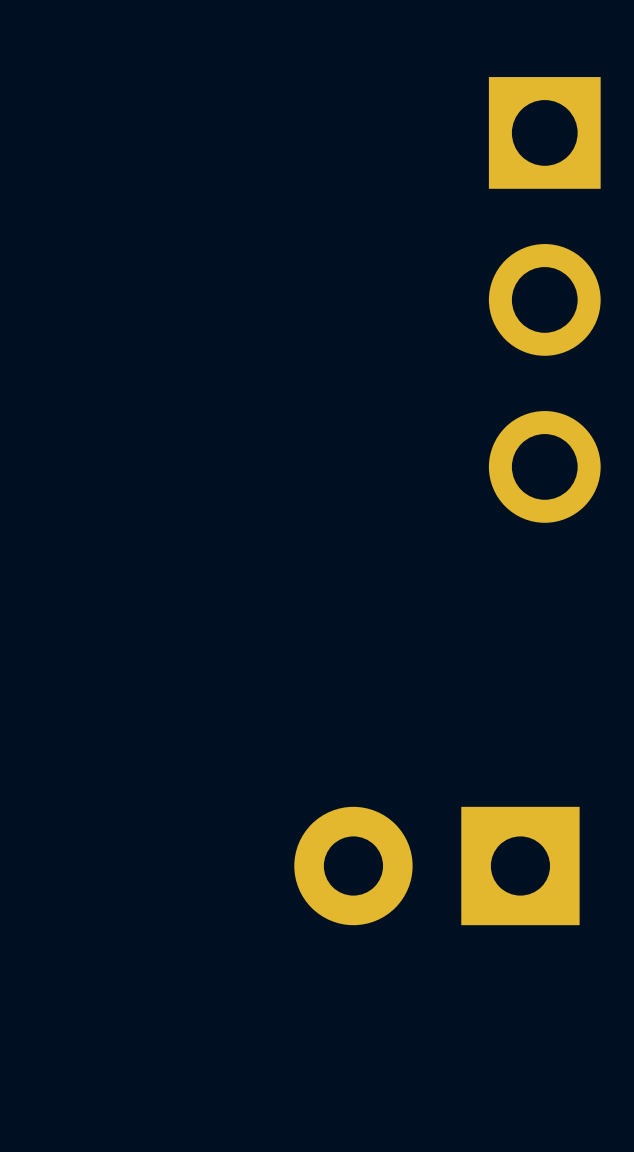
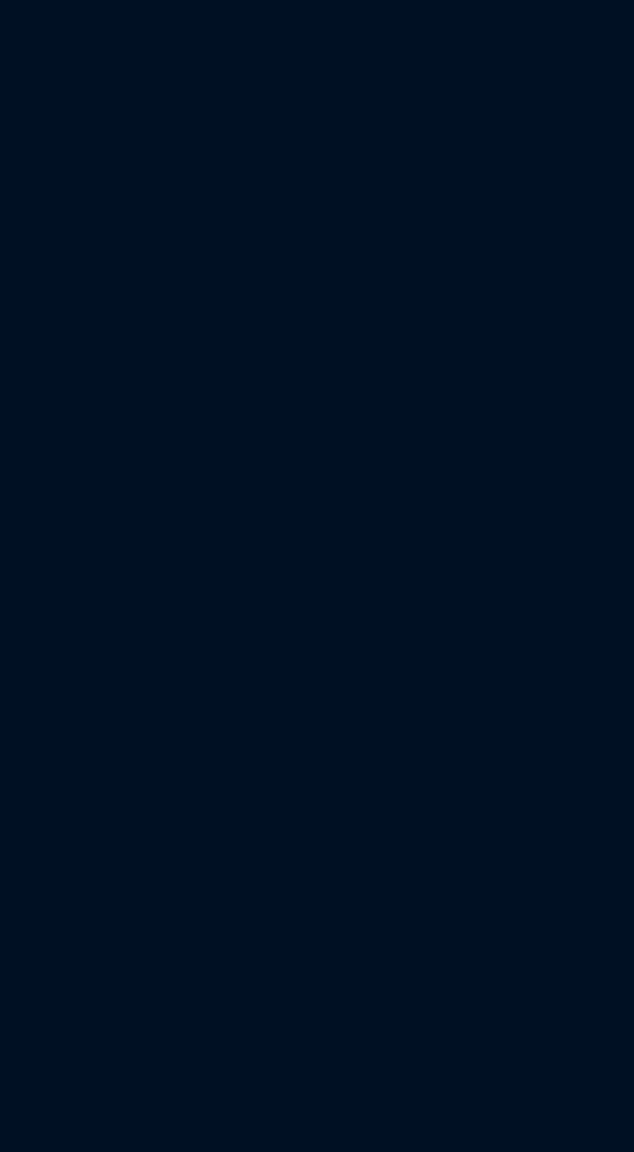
part: (544, 299) -> none
part: (436, 866) -> none

